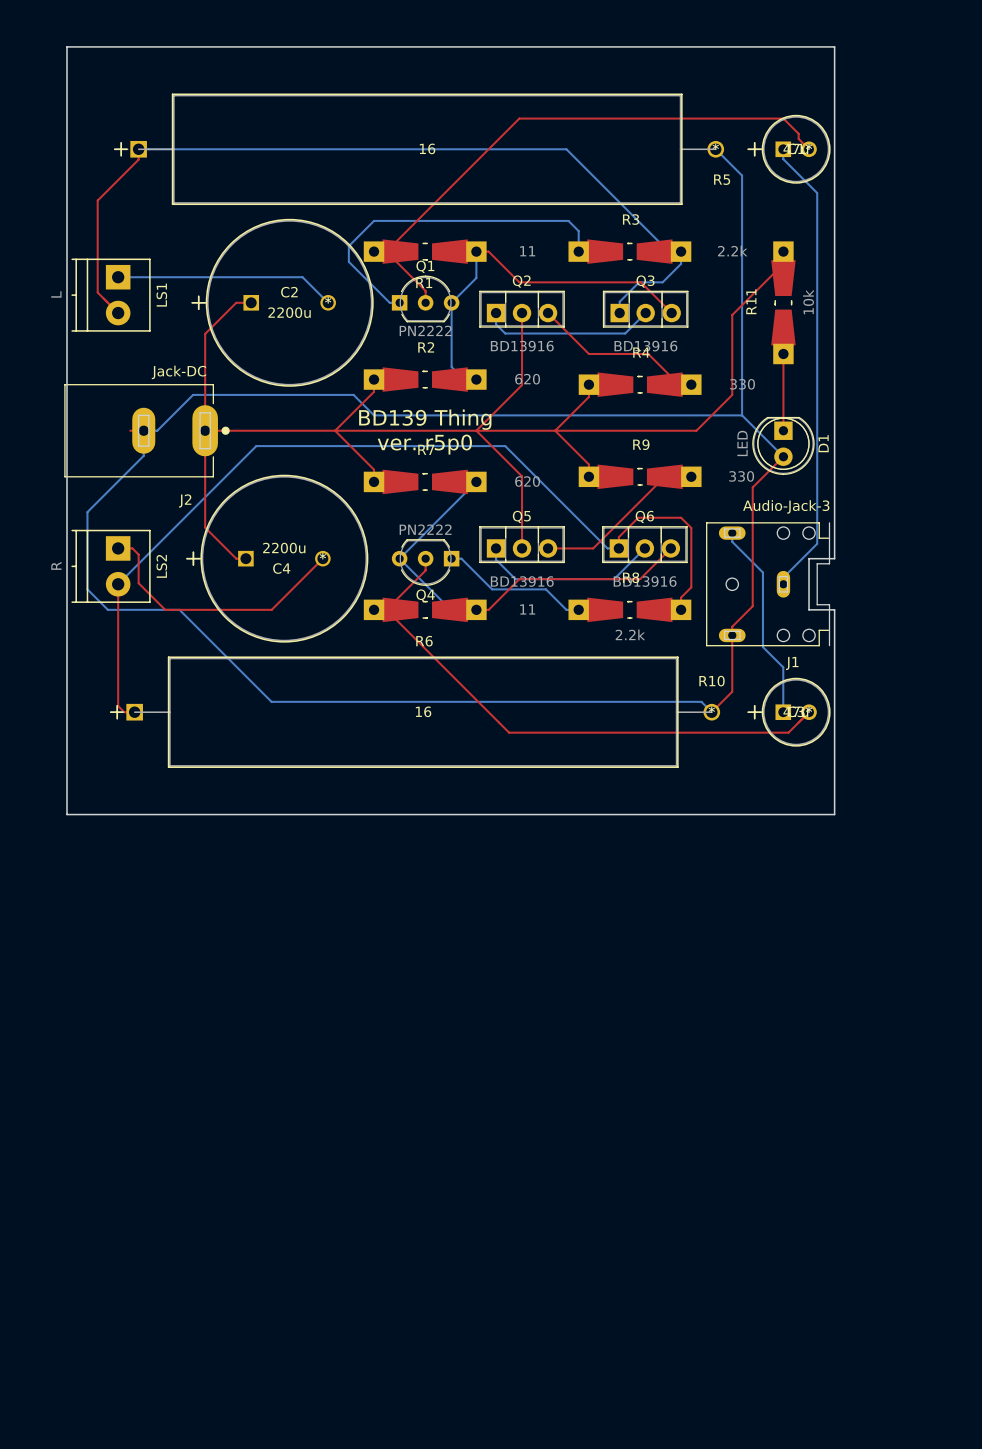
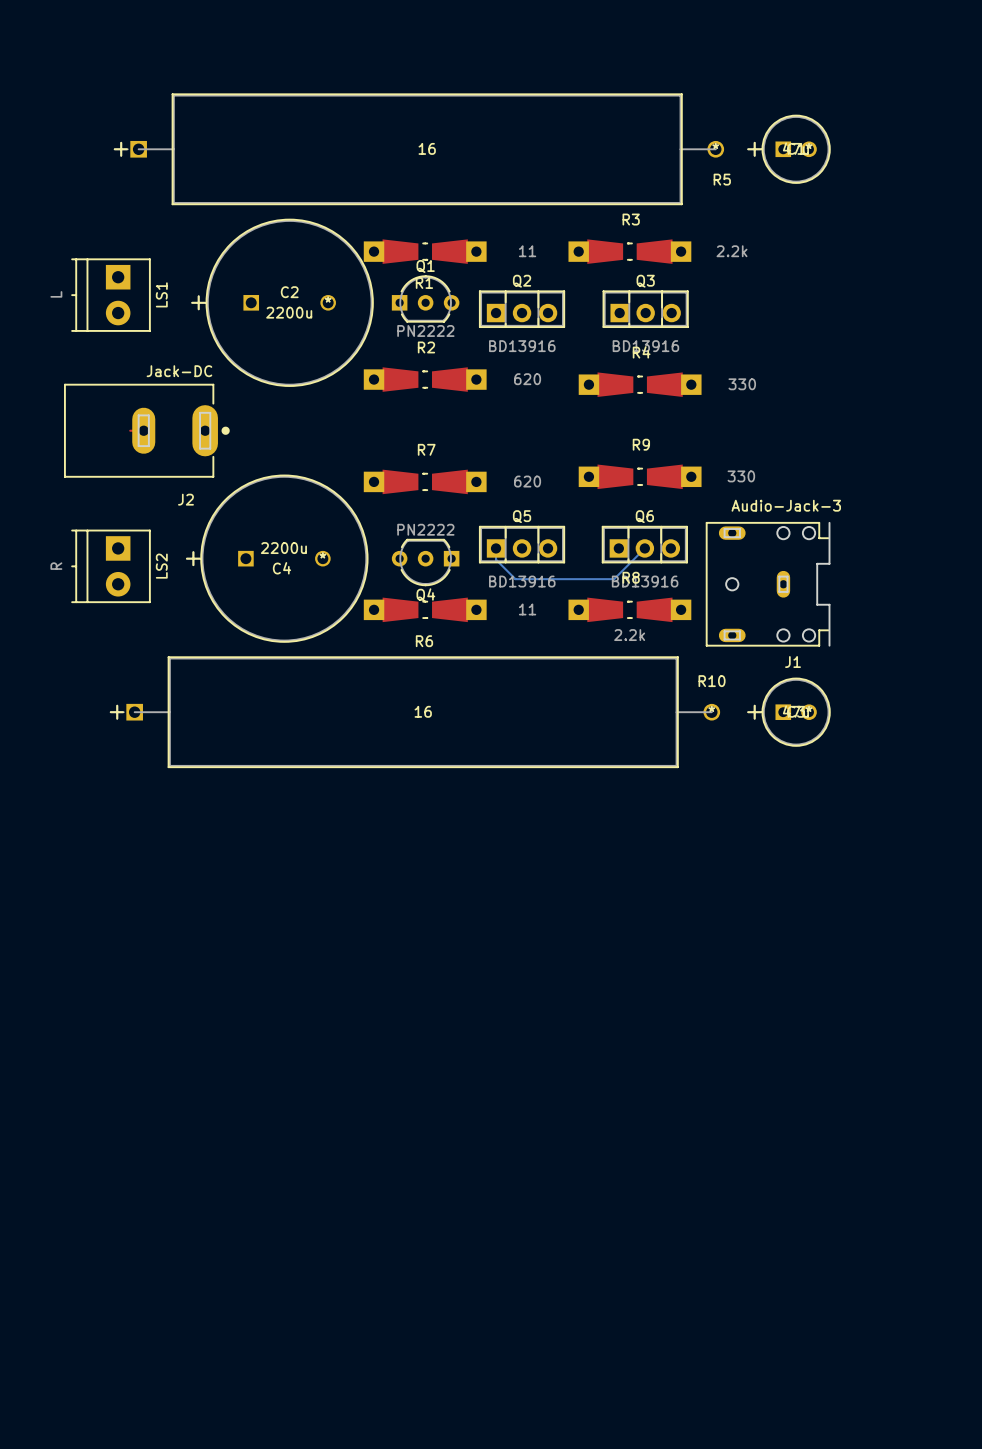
board edge: (66, 46) (66, 814) (834, 814) (834, 609) (809, 609) (809, 558) (834, 558) (834, 46) (66, 46) -> none
top track: (135, 146) (138, 149) (138, 159) (97, 200) (97, 292) (118, 313) -> none
bottom track: (138, 149) (566, 149) (668, 251) (681, 251) (681, 263) (662, 282) (639, 282) (619, 301) (619, 313) -> none
bottom track: (715, 149) (742, 175) (742, 415) -> none
bottom track: (783, 149) (783, 159) (817, 193) (817, 543) (783, 577) (783, 584) -> none
top track: (809, 149) (798, 138) (798, 133) (783, 118) (519, 118) (386, 251) (425, 290) (425, 302) -> none
top track: (449, 251) (488, 251) (519, 282) (640, 282) (671, 313) -> none
bottom track: (476, 251) (476, 278) (451, 302) (451, 367) (464, 379) (476, 379) -> none
bottom track: (578, 251) (578, 231) (568, 220) (374, 220) (348, 246) (348, 261) (389, 302) (399, 302) -> none
top track: (783, 251) (783, 263) (732, 315) (732, 394) (696, 430) (205, 430) -> none
bottom track: (118, 277) (302, 277) (328, 302) -> none
top track: (246, 302) (236, 302) (205, 333) (205, 527) (236, 558) (246, 558) -> none
R11: 10k (783, 302) -> none
bottom track: (496, 313) (496, 324) (505, 333) (625, 333) (645, 313) -> none
top track: (522, 313) (522, 385) (476, 430) (522, 476) (522, 548) -> none
top track: (548, 313) (588, 353) (648, 353) (679, 384) (691, 384) -> none
top track: (783, 327) (783, 430) -> none
top track: (400, 379) (374, 379) (374, 391) (335, 430) (374, 469) (374, 481) (386, 481) -> none
top track: (615, 384) (588, 384) (588, 396) (555, 430) (588, 464) (588, 476) (615, 476) -> none
bottom track: (742, 415) (374, 415) (353, 394) (193, 394) (157, 430) (143, 430) (143, 455) (87, 512) (87, 589) (107, 609) (179, 609) (271, 701) (701, 701) (711, 712) -> none
bottom track: (742, 415) (783, 456) -> none
text: BD139 Thing (425, 419) -> none
text: ver. r5p0 (424, 444) -> none
D1: LED (783, 445) -> none
top track: (783, 456) (752, 487) (752, 606) (732, 626) (732, 691) (711, 712) -> none
top track: (691, 476) (664, 476) (593, 548) (548, 548) -> none
bottom track: (476, 481) (399, 558) (450, 609) (476, 609) -> none
bottom track: (732, 533) (732, 541) (762, 572) (762, 647) (783, 667) (783, 712) -> none
top track: (118, 548) (132, 548) (138, 554) (138, 583) (165, 609) (271, 609) (322, 558) -> none
bottom track: (618, 548) (607, 548) (505, 446) (256, 446) (118, 584) -> none
top track: (618, 548) (618, 537) (638, 517) (681, 517) (691, 527) (691, 587) (681, 597) (681, 609) (654, 609) -> none
top track: (670, 548) (640, 579) (519, 579) (488, 609) (449, 609) -> none
top track: (425, 558) (425, 570) (386, 609) -> none
bottom track: (451, 558) (461, 558) (492, 589) (545, 589) (566, 609) (578, 609) -> none
top track: (118, 584) (118, 706) (124, 712) (134, 712) -> none
top track: (386, 609) (509, 732) (788, 732) (809, 712) -> none

